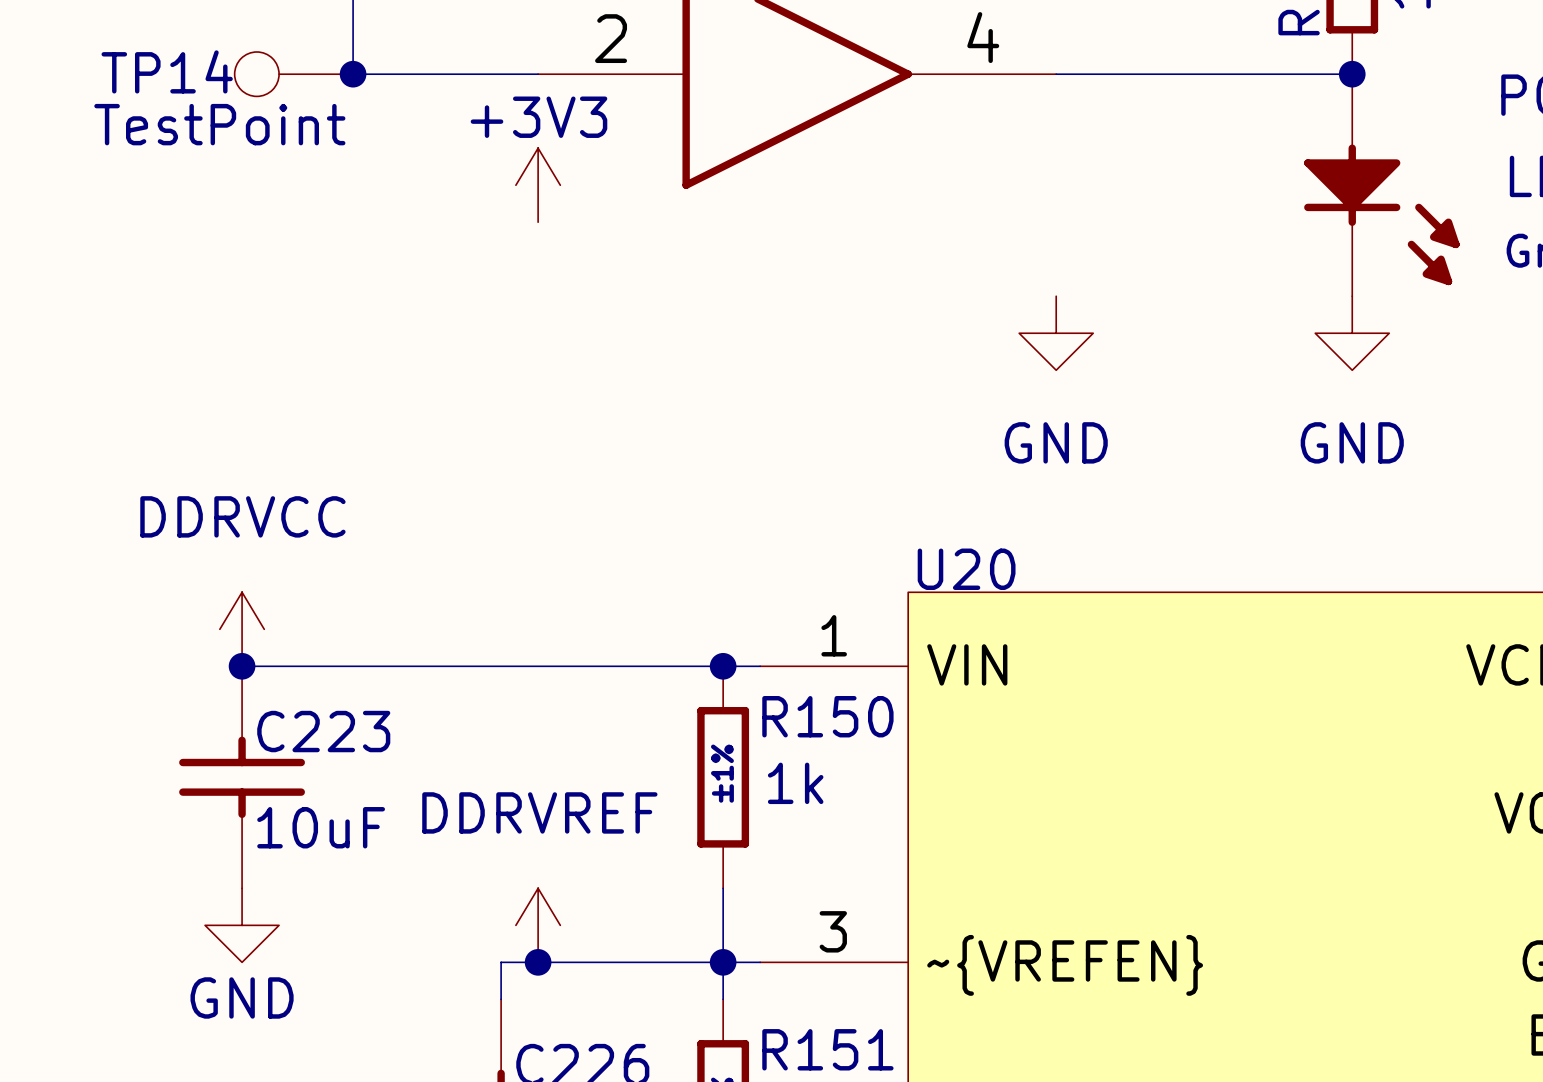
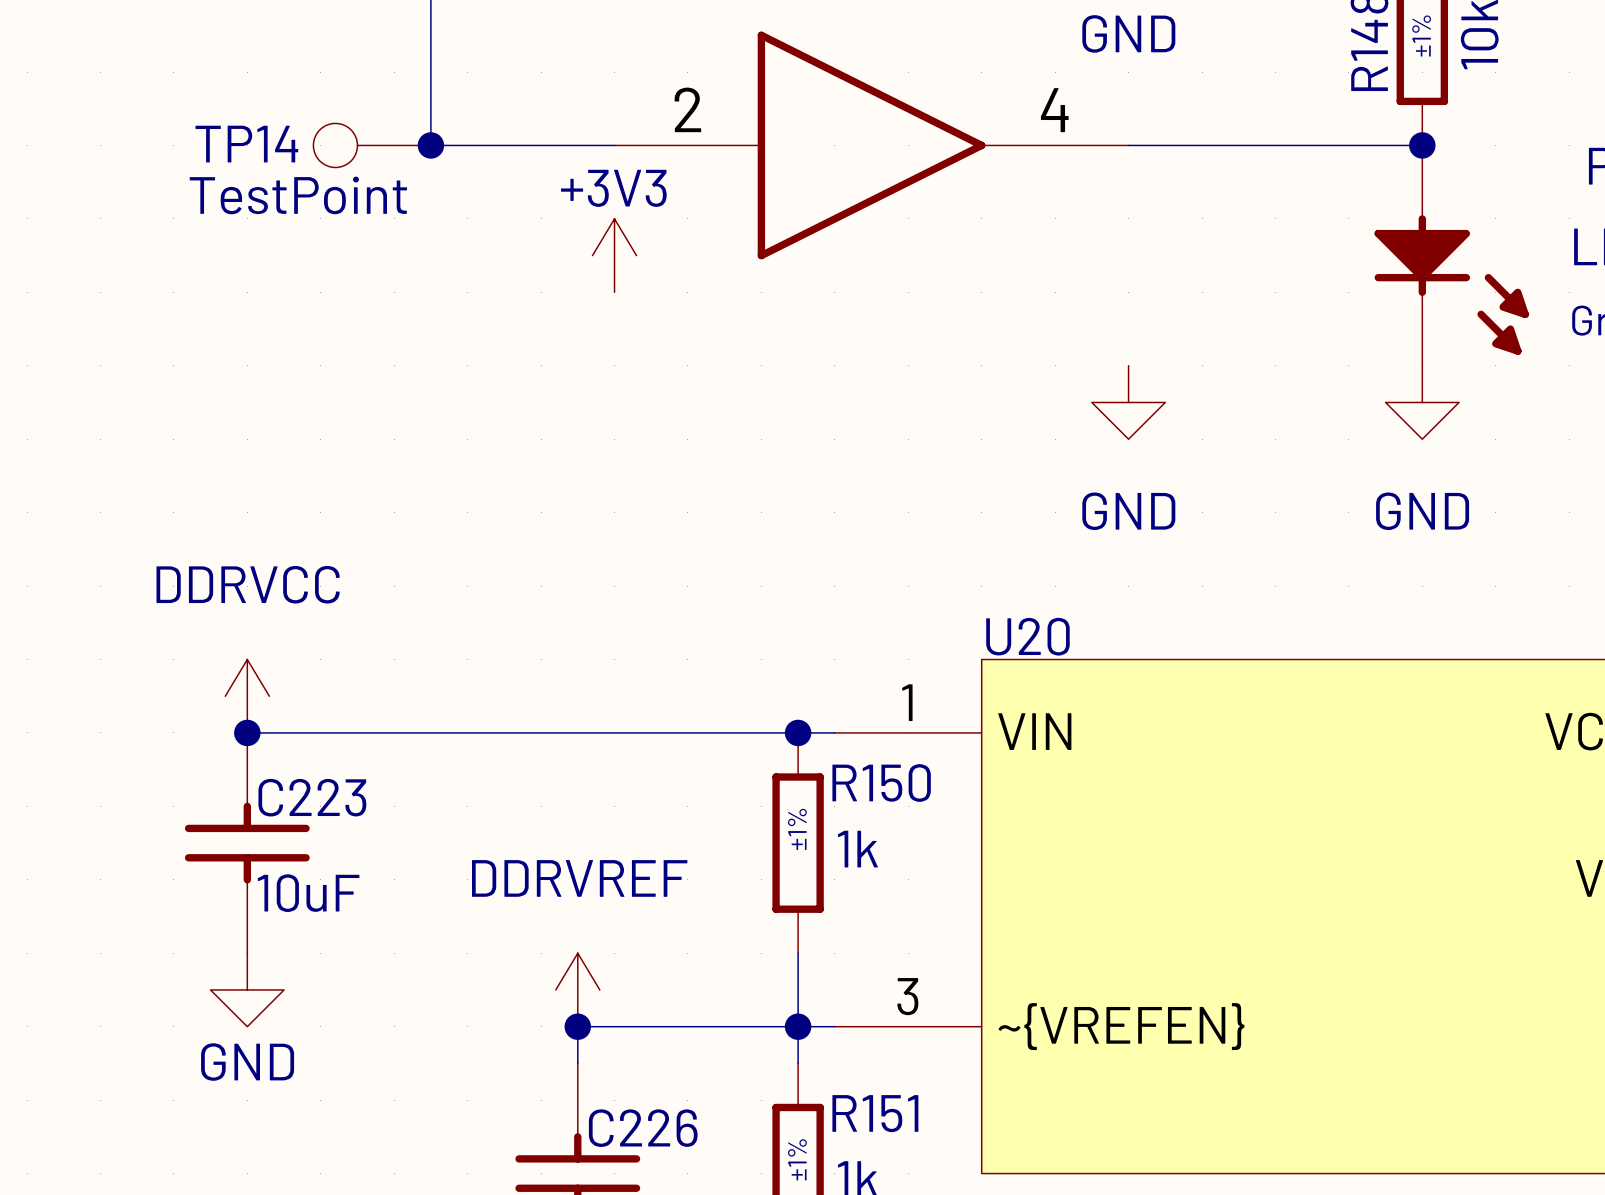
power symbol position: DDRVCC (242, 629) -> DDRVCC (247, 696)
wire: none -> (247, 732) (320, 732)
junction position: (242, 666) -> (247, 732)
C223 position: (242, 777) -> (247, 843)
power symbol position: GND (242, 925) -> GND (247, 989)
power symbol position: DDRVREF (538, 925) -> DDRVREF (577, 989)
junction position: (538, 962) -> (577, 1026)

